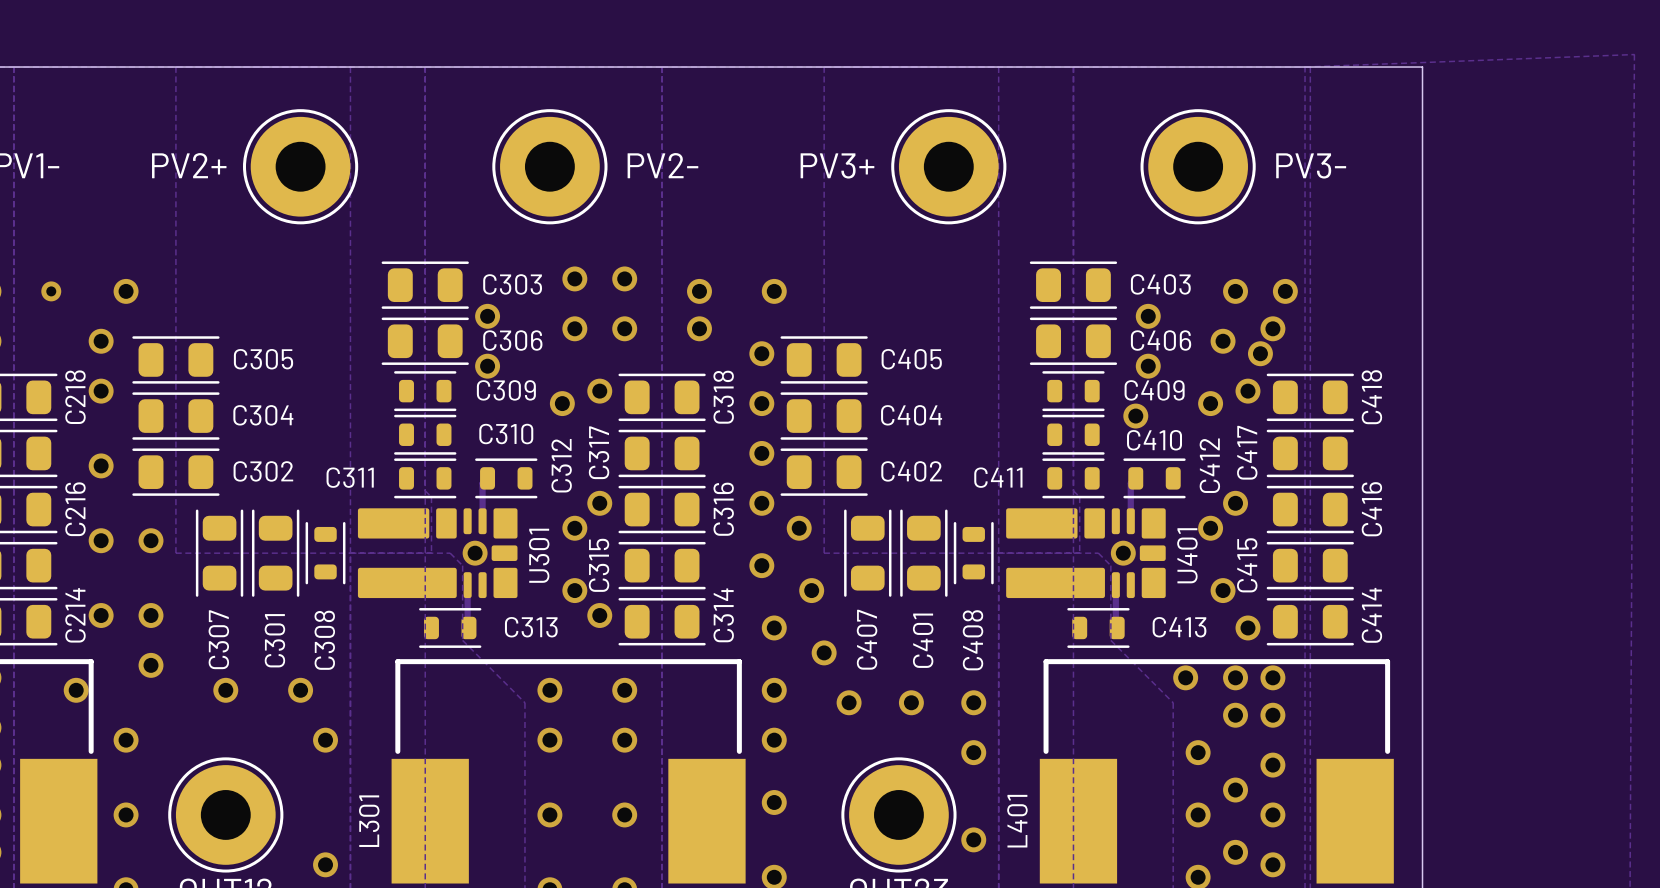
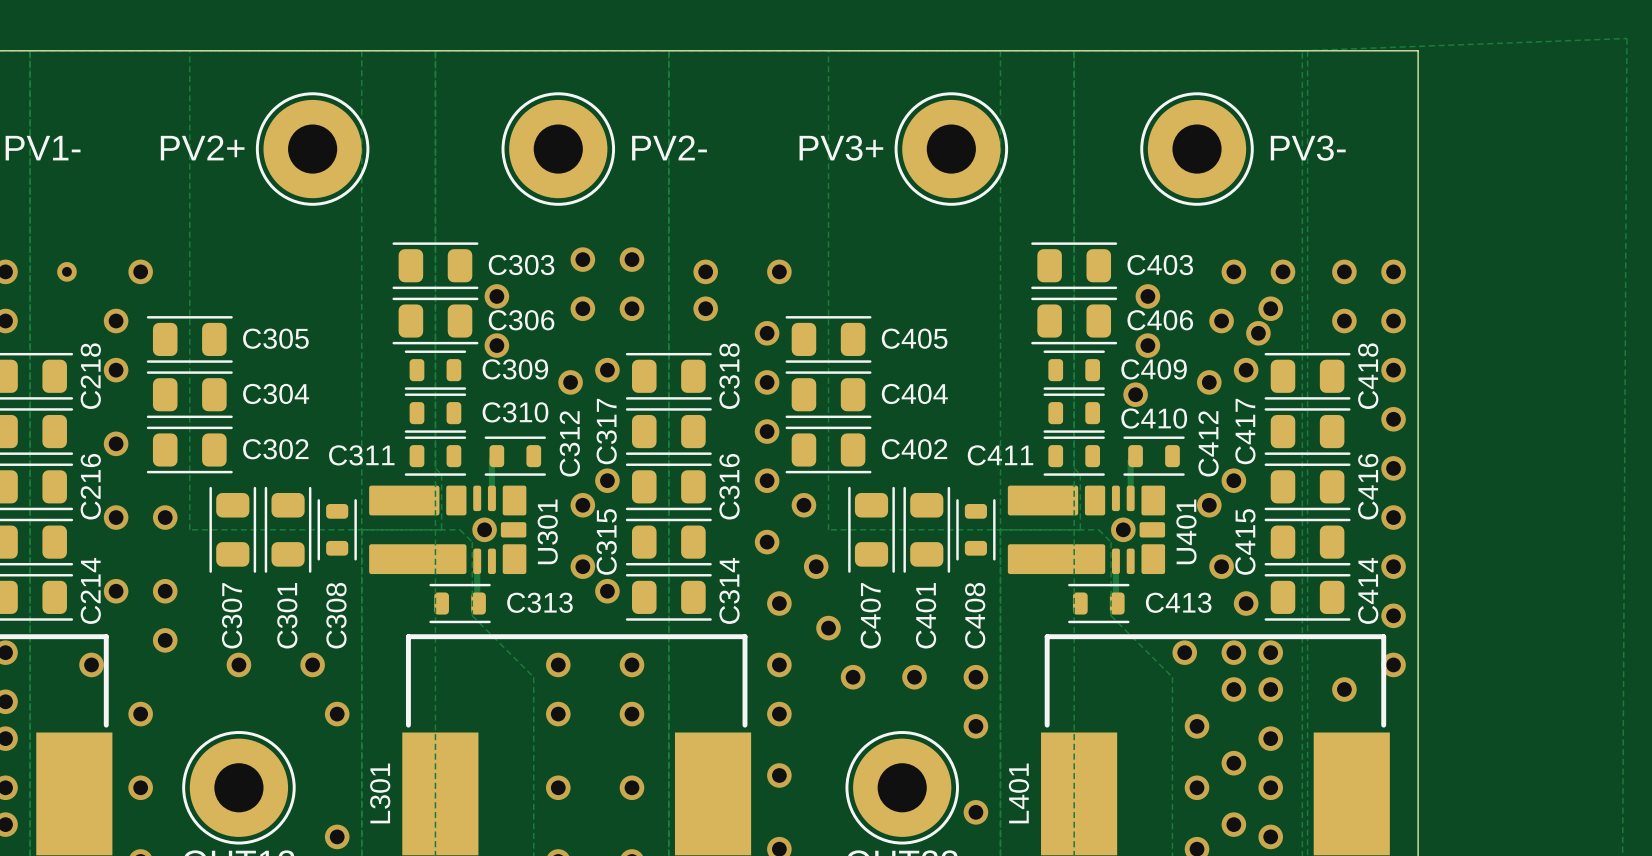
via: none -> (1344, 271)
via: none -> (1393, 271)
via: none -> (1344, 321)
via: none -> (1393, 321)
via: none -> (1393, 370)
via: none -> (1393, 419)
via: none -> (1393, 468)
via: none -> (1393, 517)
via: none -> (1393, 566)
via: none -> (1393, 615)
via: none -> (1393, 664)
via: none -> (1344, 689)

